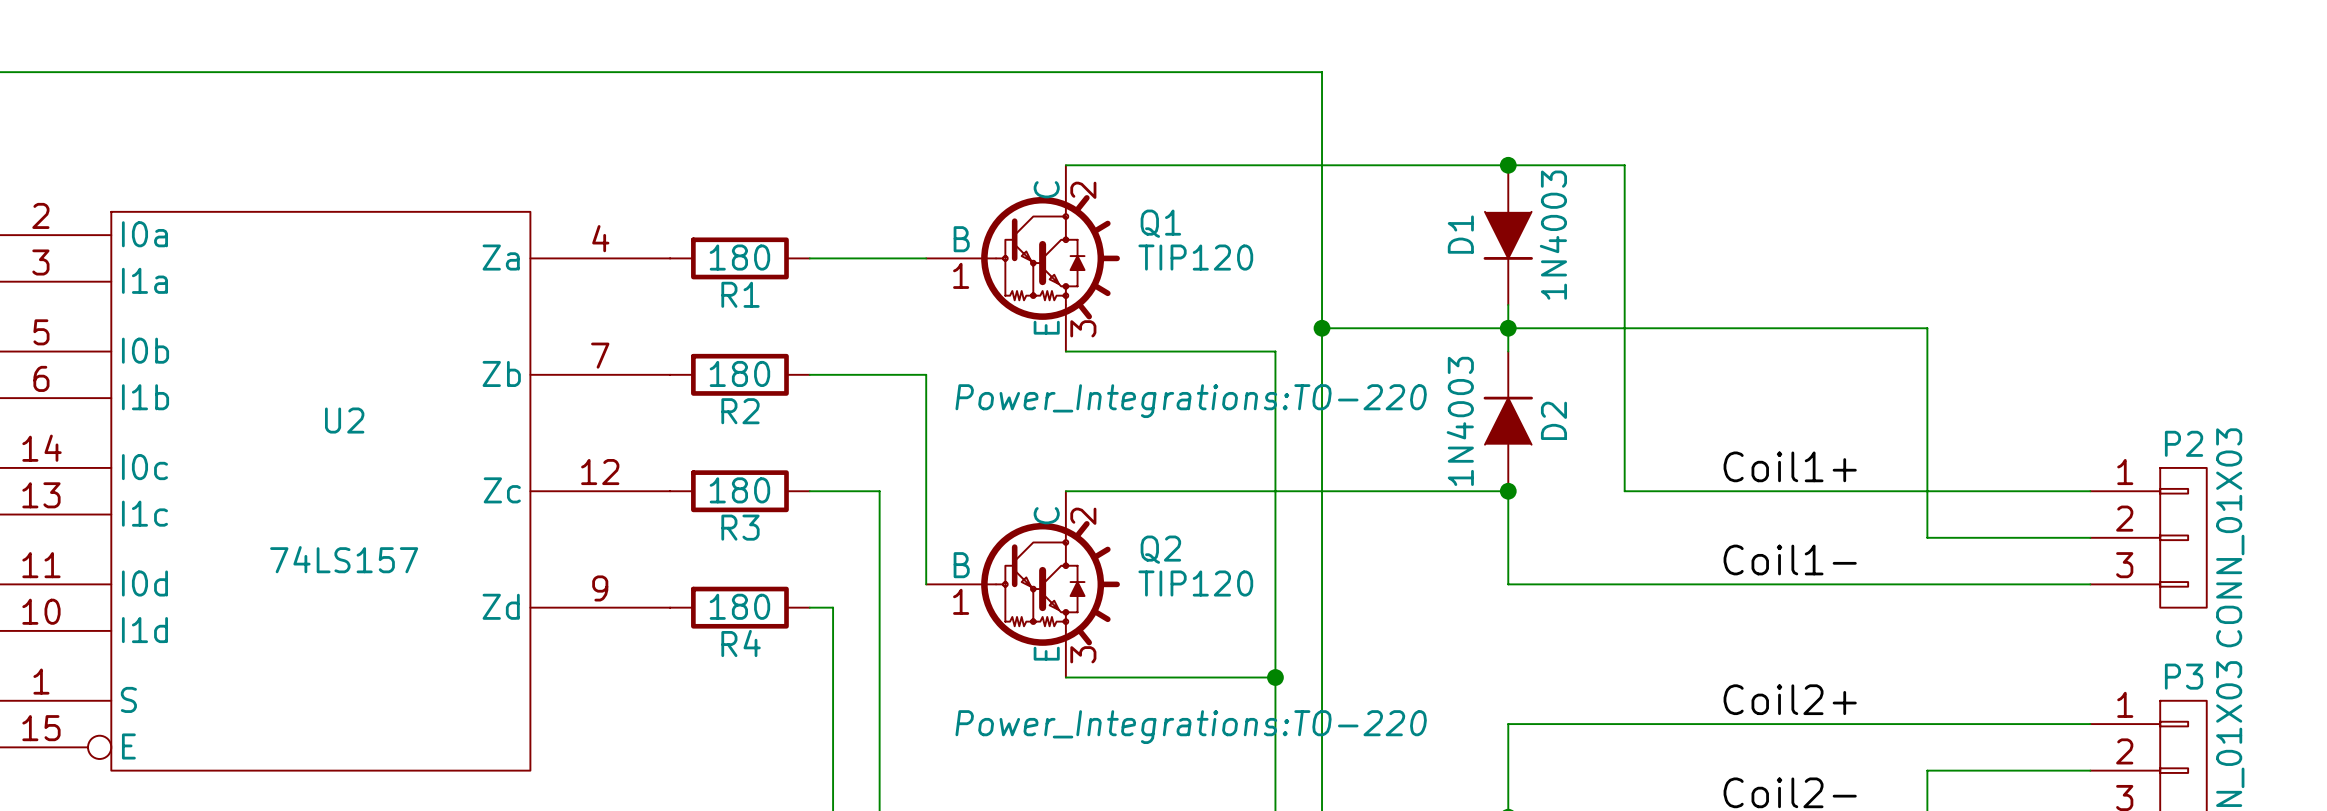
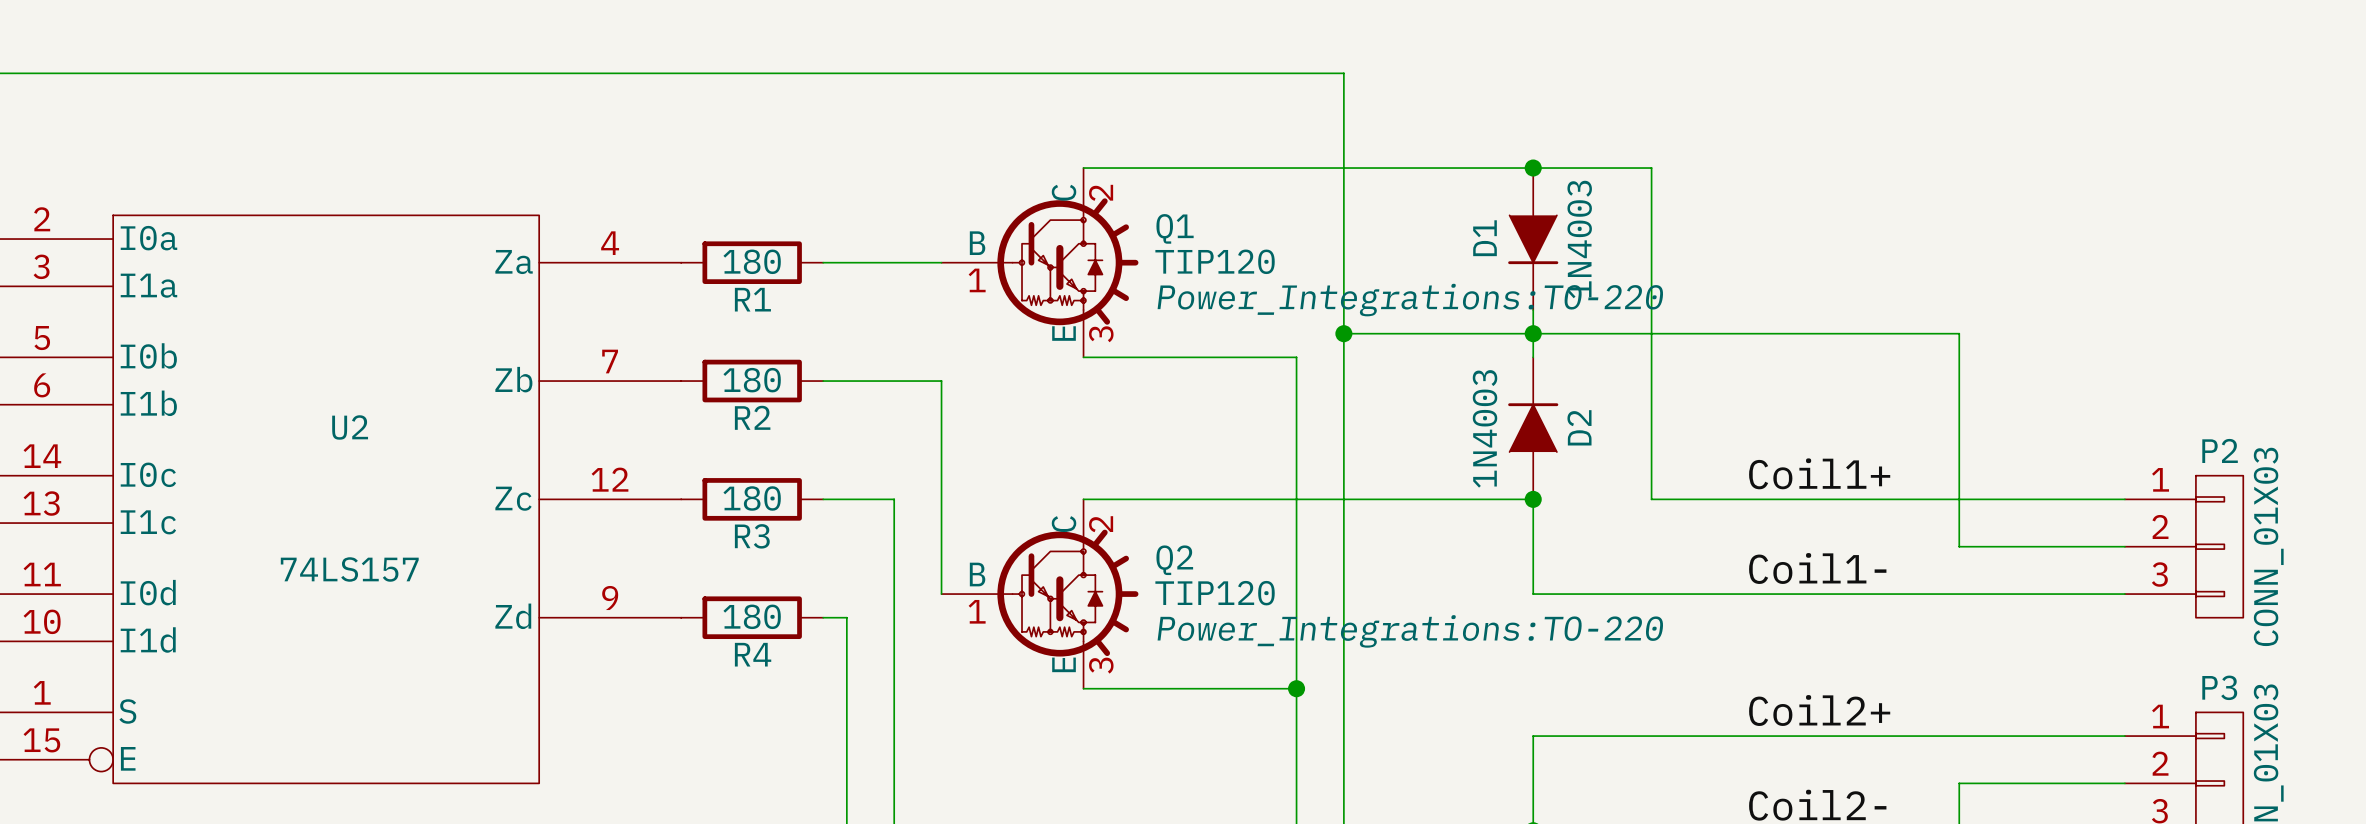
Q1 text position: Power_Integrations:TO-220 (1191, 401) -> Power_Integrations:TO-220 (1410, 300)
Q2 text position: Power_Integrations:TO-220 (1191, 727) -> Power_Integrations:TO-220 (1410, 631)

